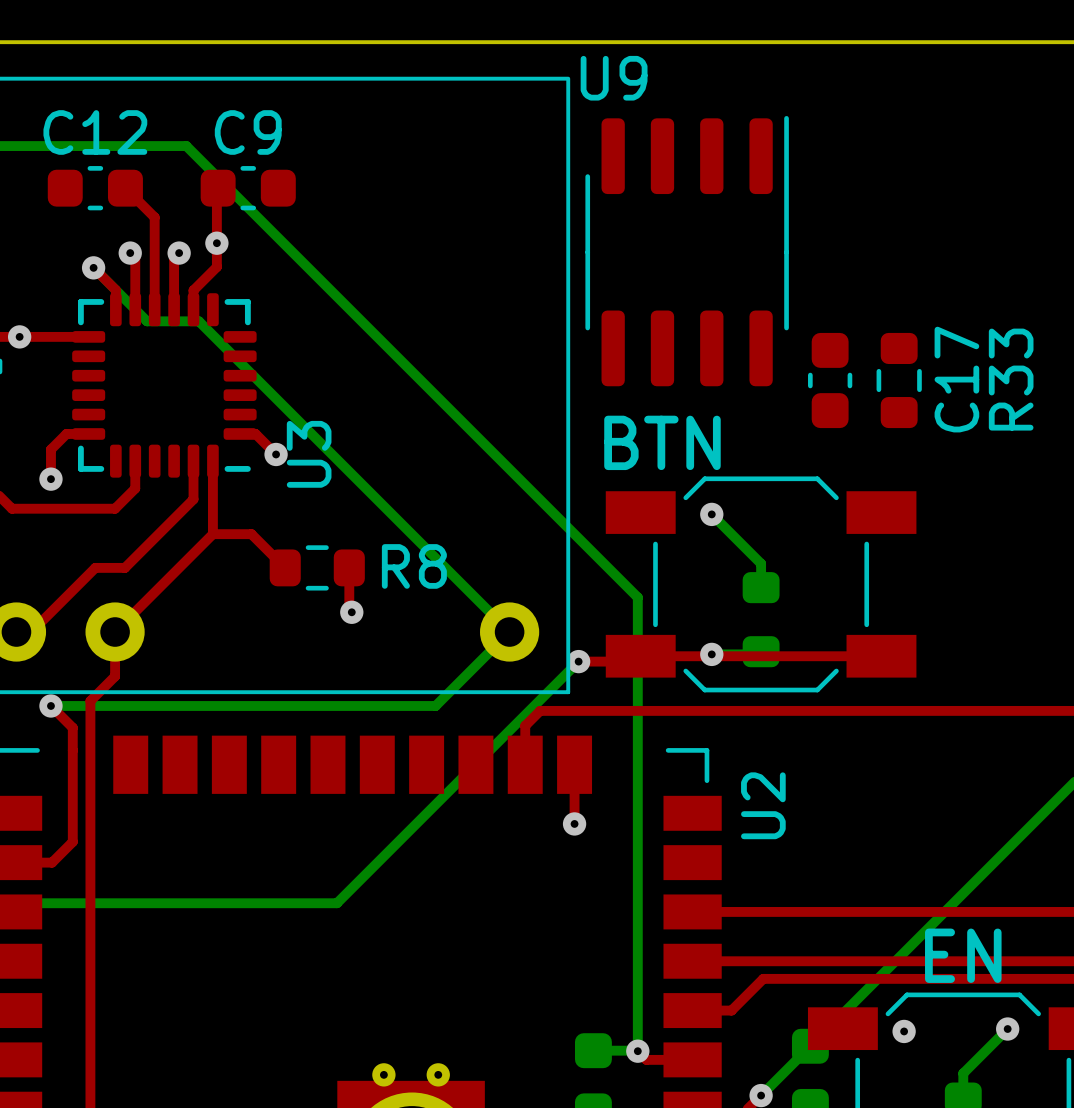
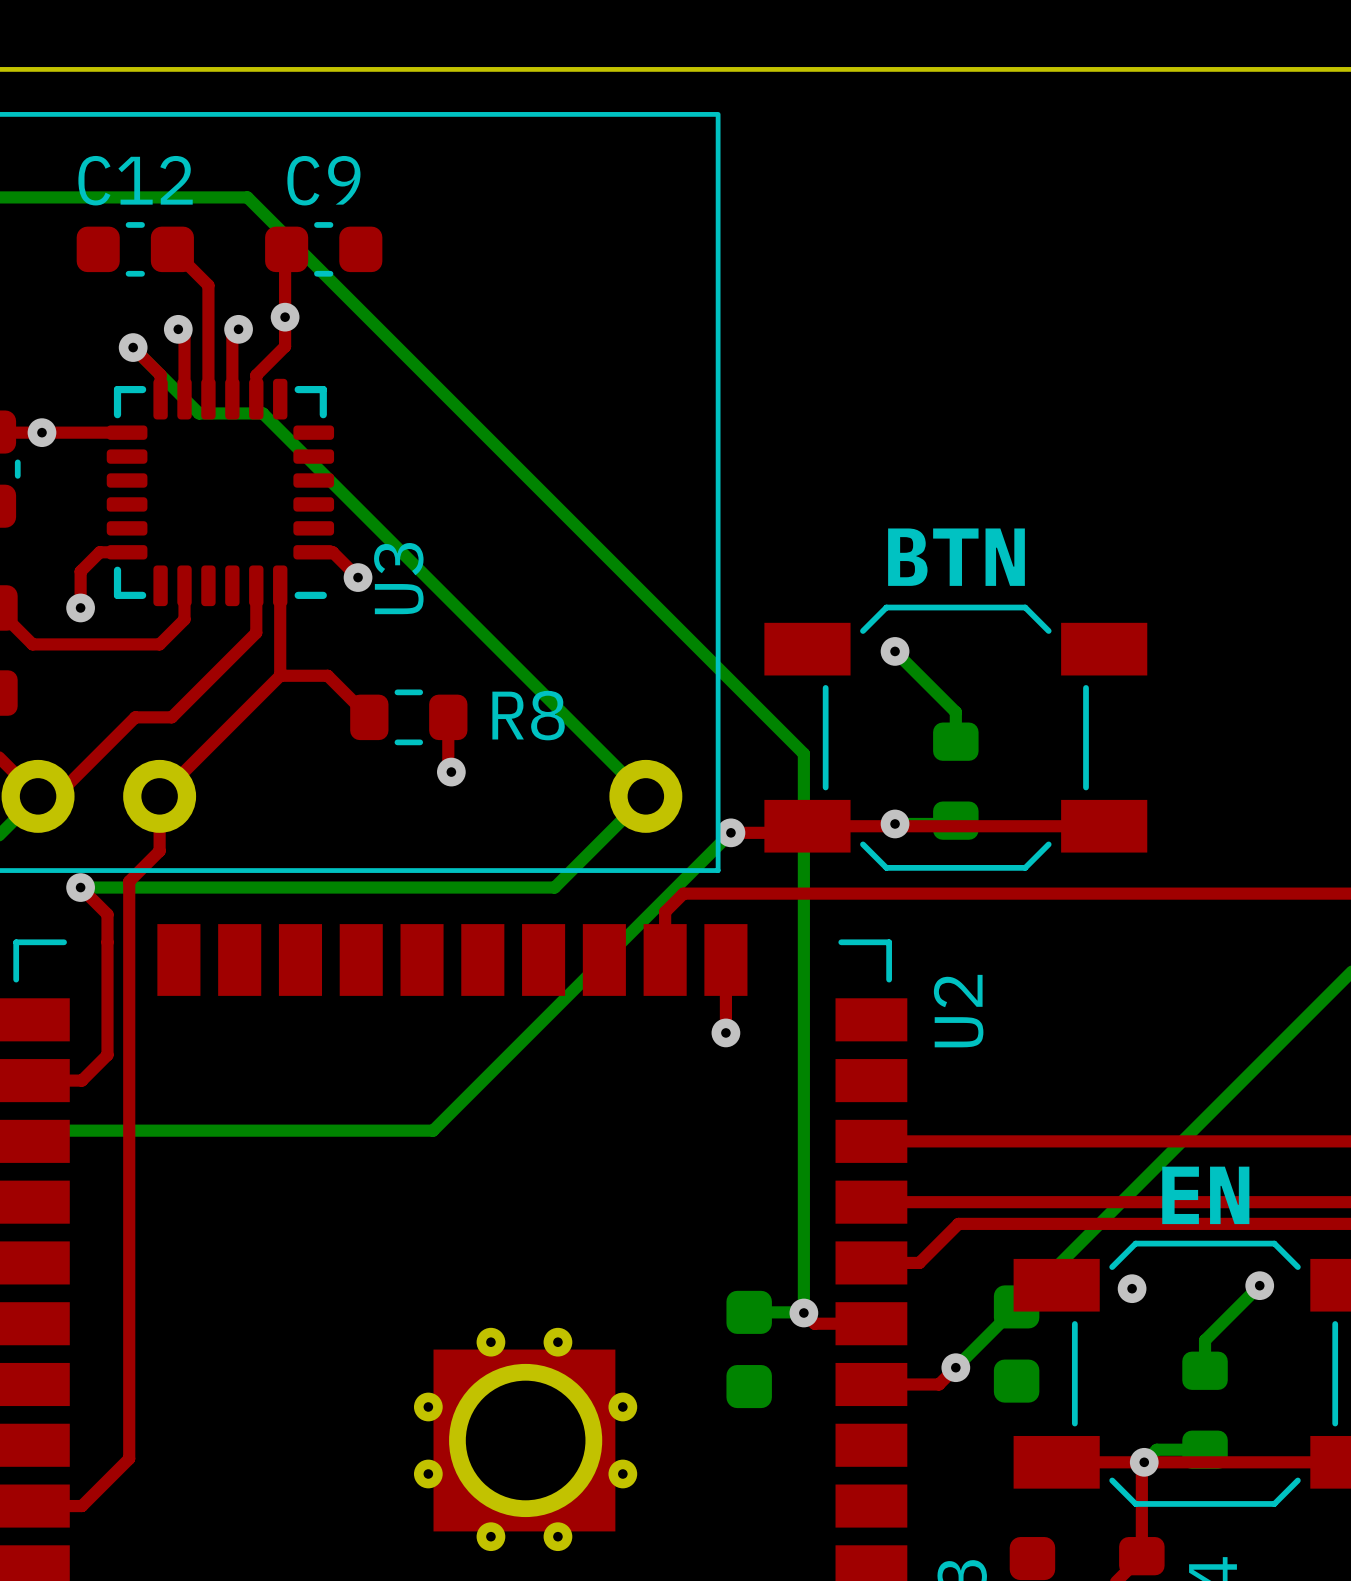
U9: (687, 251) -> none
C17: (830, 380) -> none
R33: (899, 380) -> none
text position: BTN (662, 442) -> BTN (956, 557)

